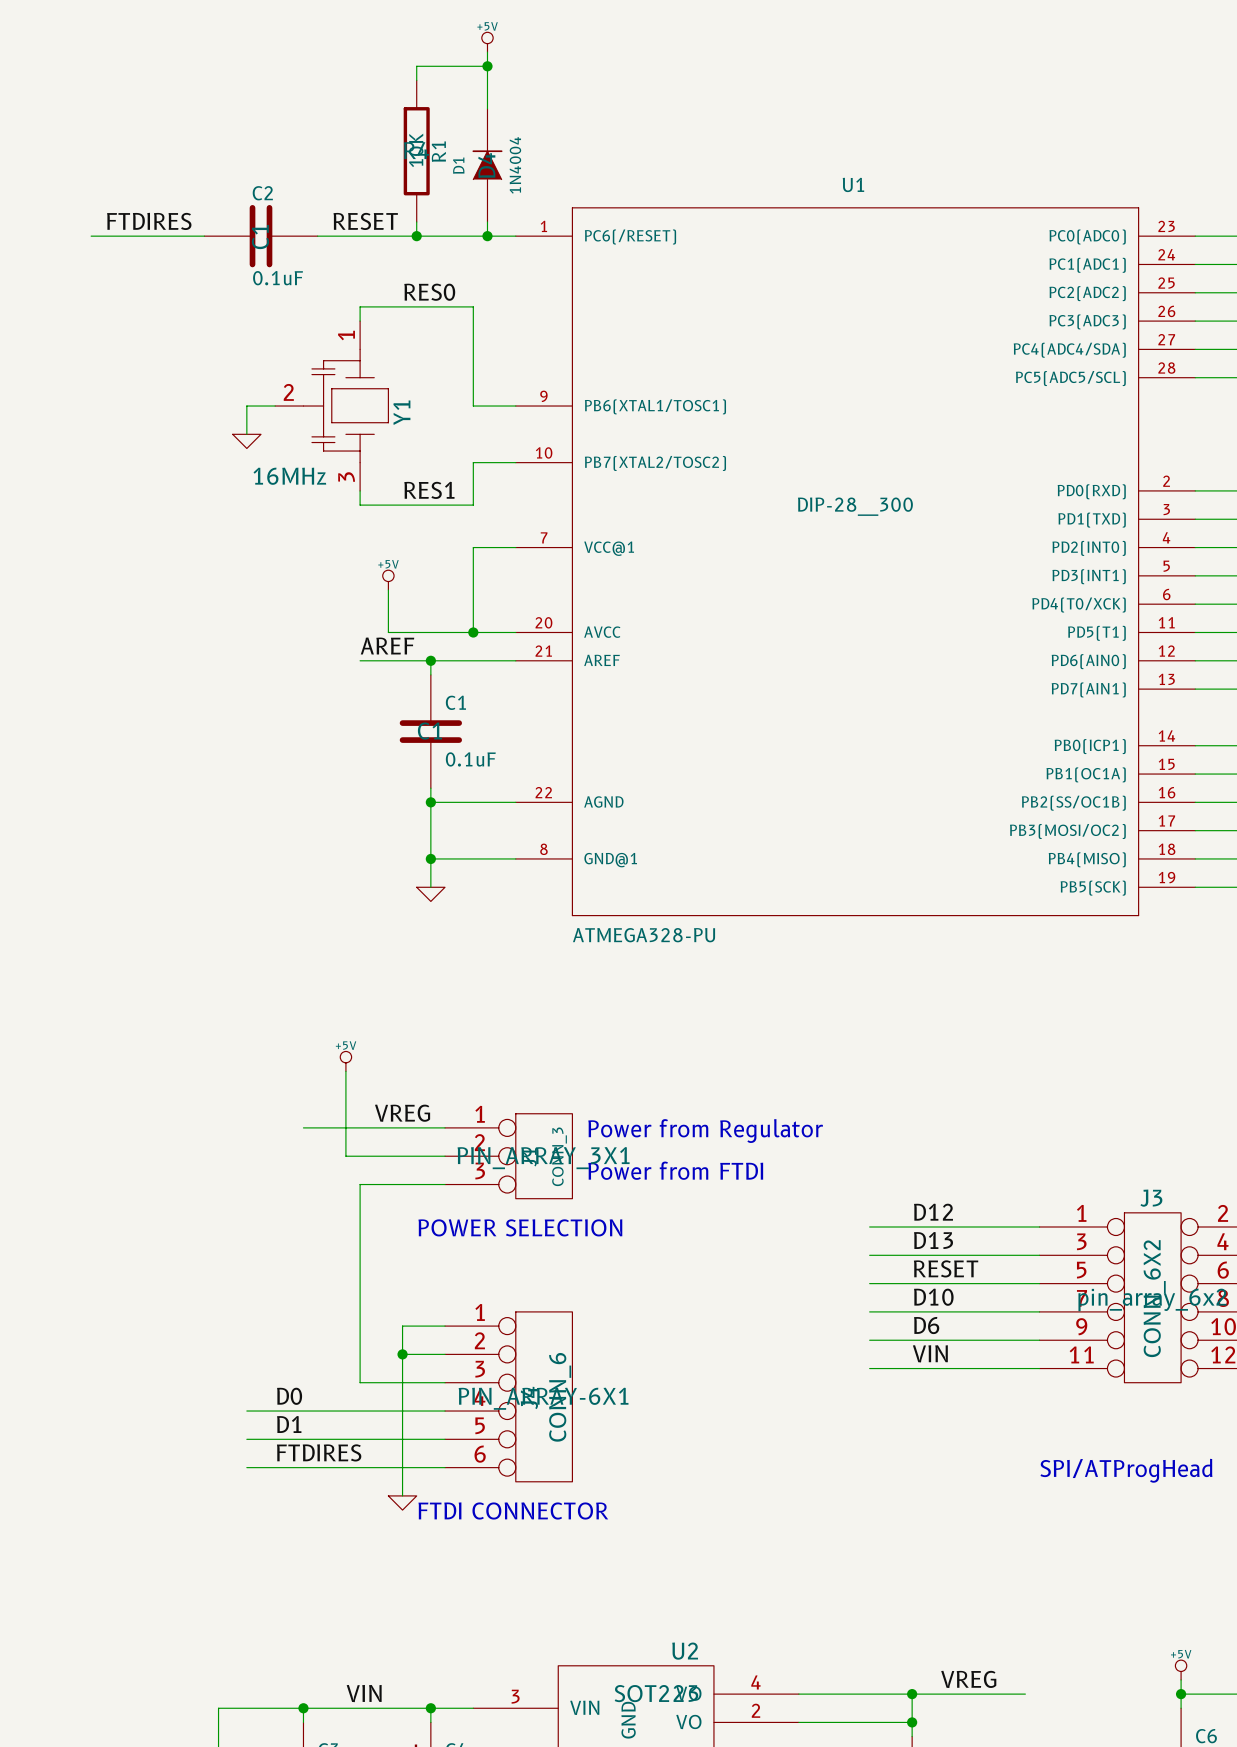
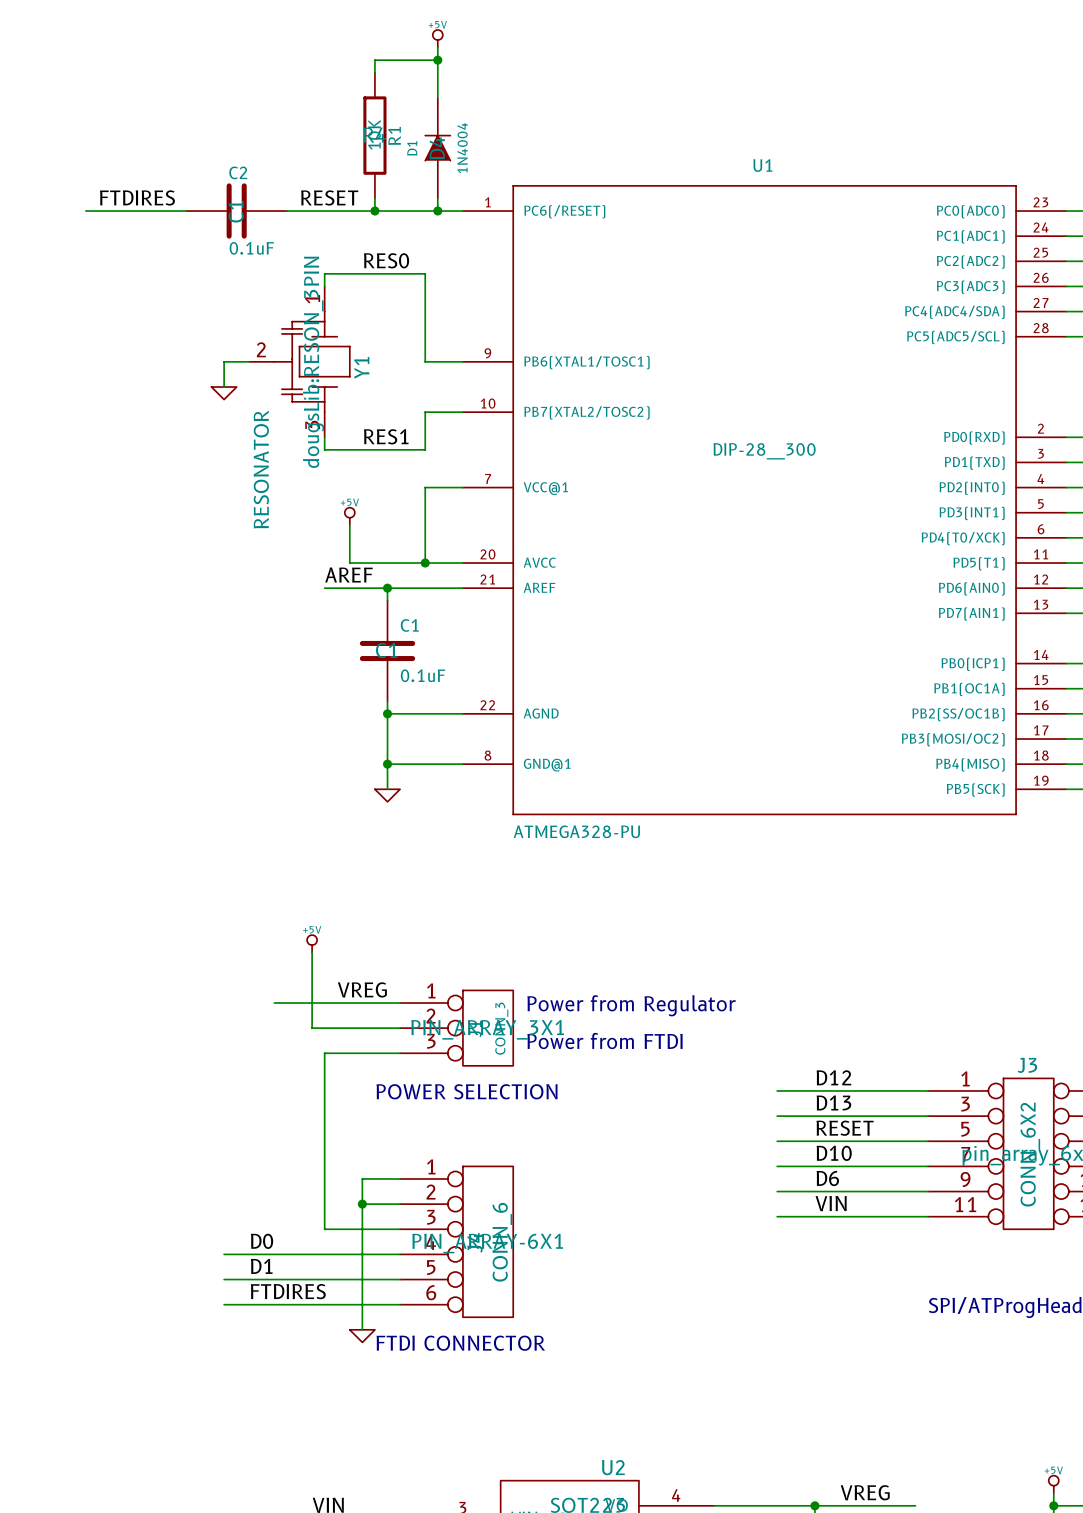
Y1 text: none -> dougsLib:RESON_3PIN (313, 362)
Y1 value: 16MHz (289, 476) -> RESONATOR (261, 469)

